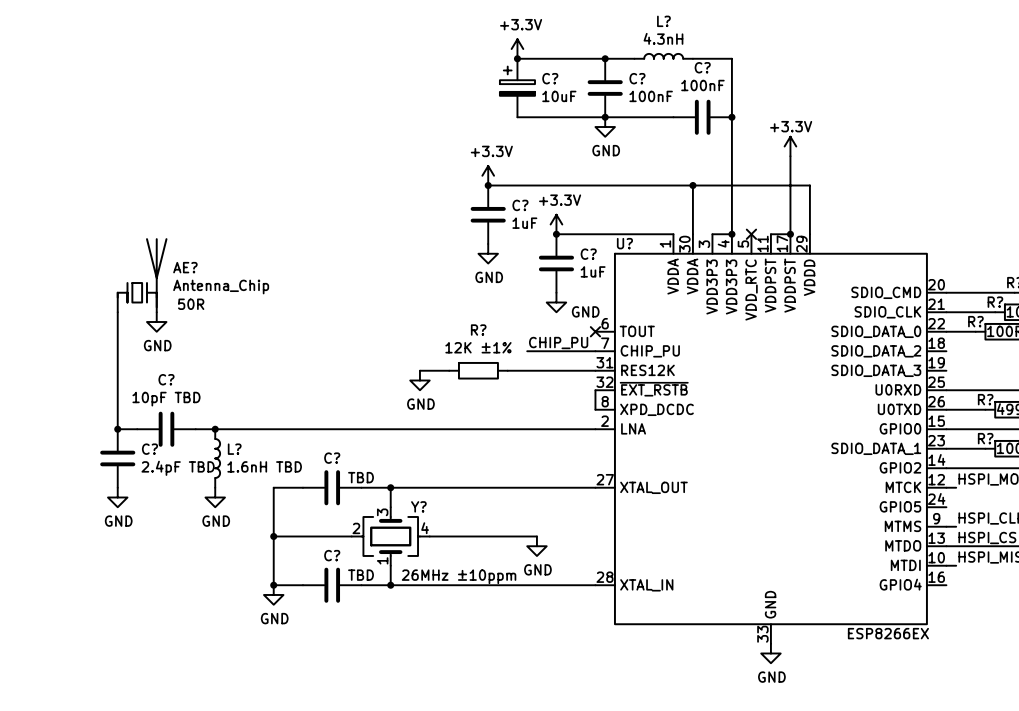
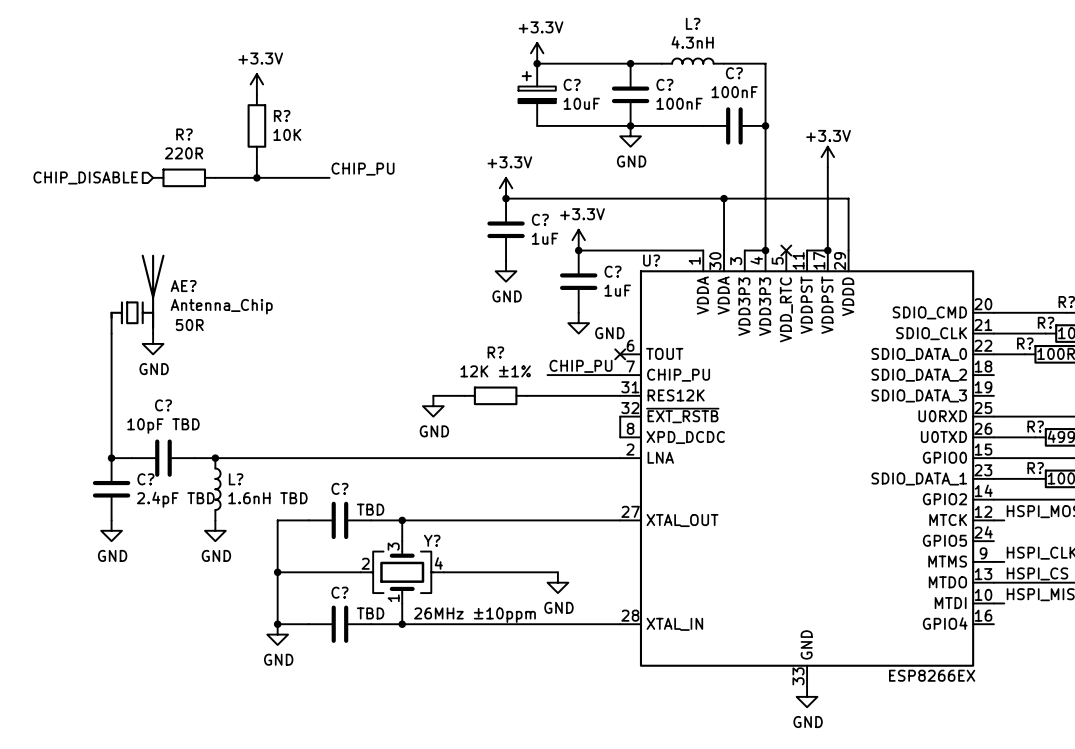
power symbol: none -> +3.3V (256, 84)
R?: none -> 10K (256, 125)
wire: none -> (256, 157) (256, 177)
label: none -> CHIP_PU (363, 169)
hierarchical label: none -> CHIP_DISABLE (85, 177)
R?: none -> 220R (184, 177)
wire: none -> (215, 177) (329, 177)
junction: none -> (256, 177)

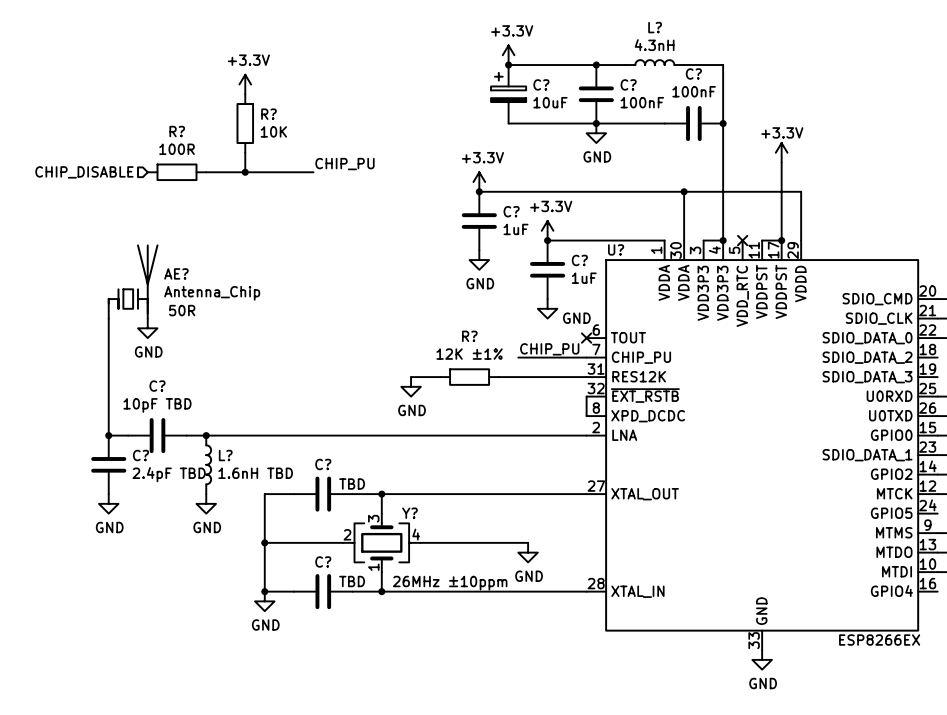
R? value: 220R (183, 153) -> 100R (177, 149)

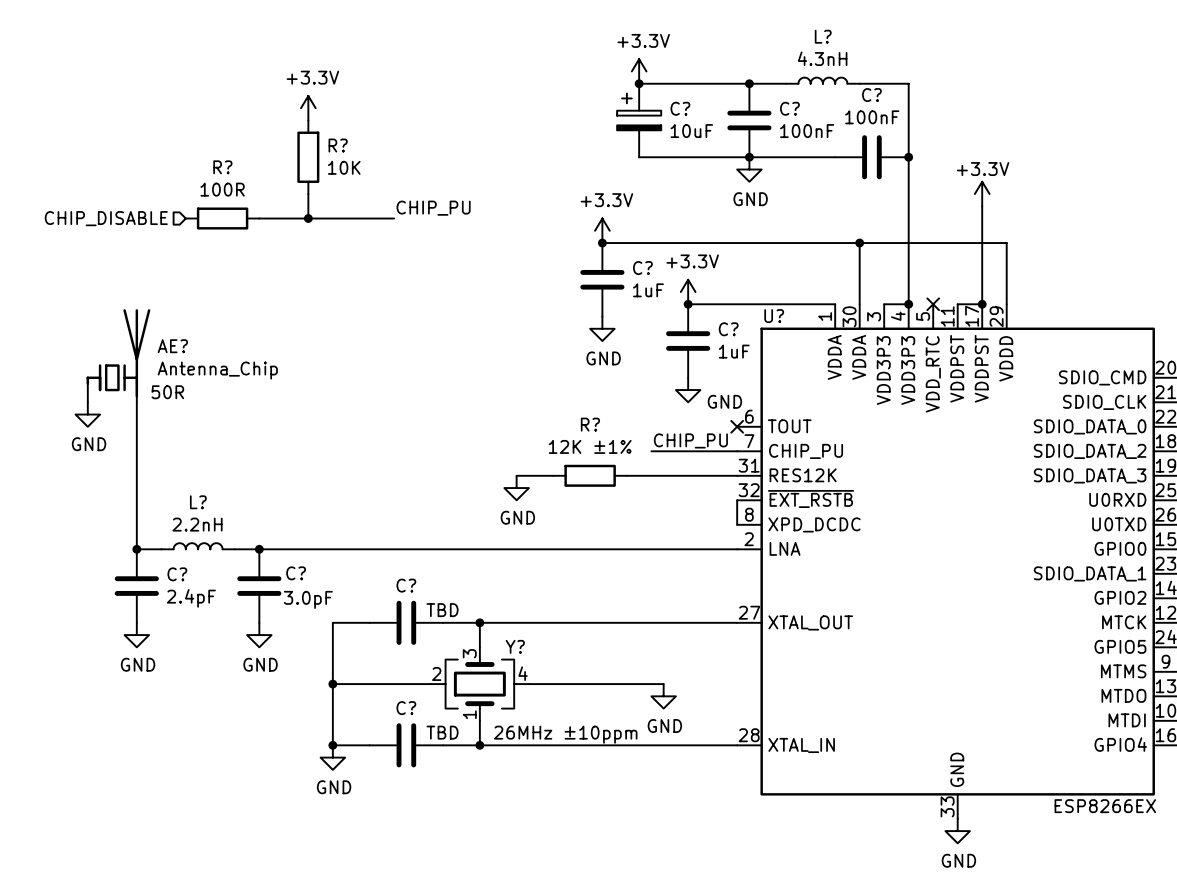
AE? position: (133, 281) -> (118, 355)
text position: 50R (182, 310) -> 50R (167, 392)
power symbol position: GND (147, 328) -> GND (87, 414)
L?: none -> 2.2nH (198, 546)
C?: 10pF TBD (157, 435) -> none
C?: none -> 3.0pF (259, 586)
L?: 1.6nH TBD (208, 464) -> none
C? value: 2.4pF TBD (169, 474) -> 2.4pF (191, 598)

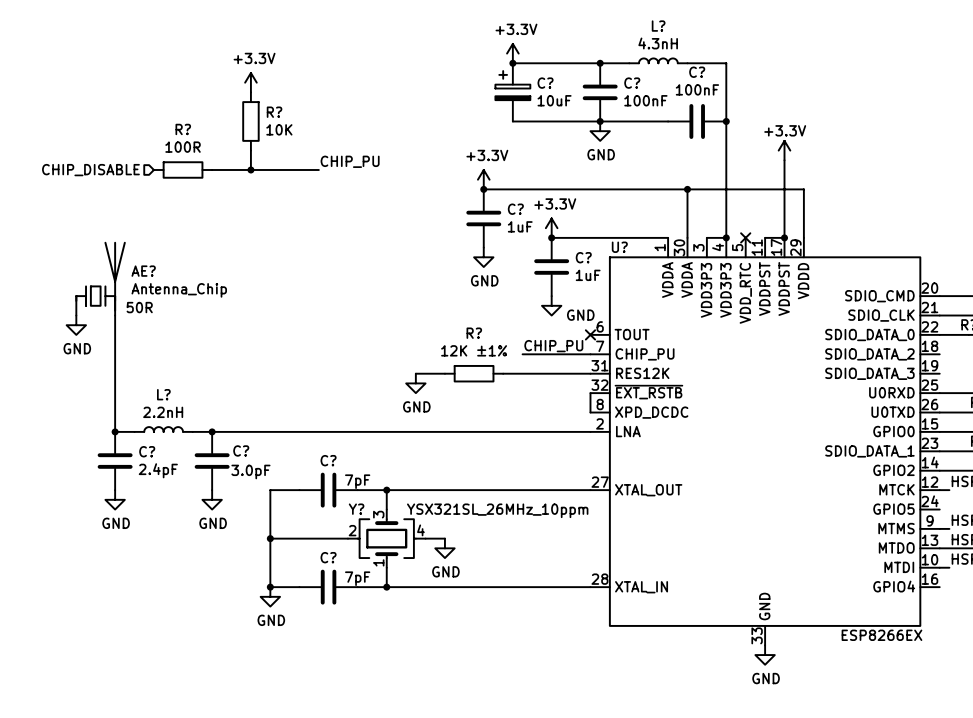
C? value: TBD (442, 610) -> 7pF (357, 481)
Y? name position: Y? (515, 646) -> Y? (356, 509)
wire: (553, 684) (663, 684) -> none
power symbol position: GND (663, 696) -> GND (444, 548)
C? value: TBD (442, 732) -> 7pF (357, 578)
Y? value: 26MHz ±10ppm (565, 734) -> YSX321SL_26MHz_10ppm (497, 510)

